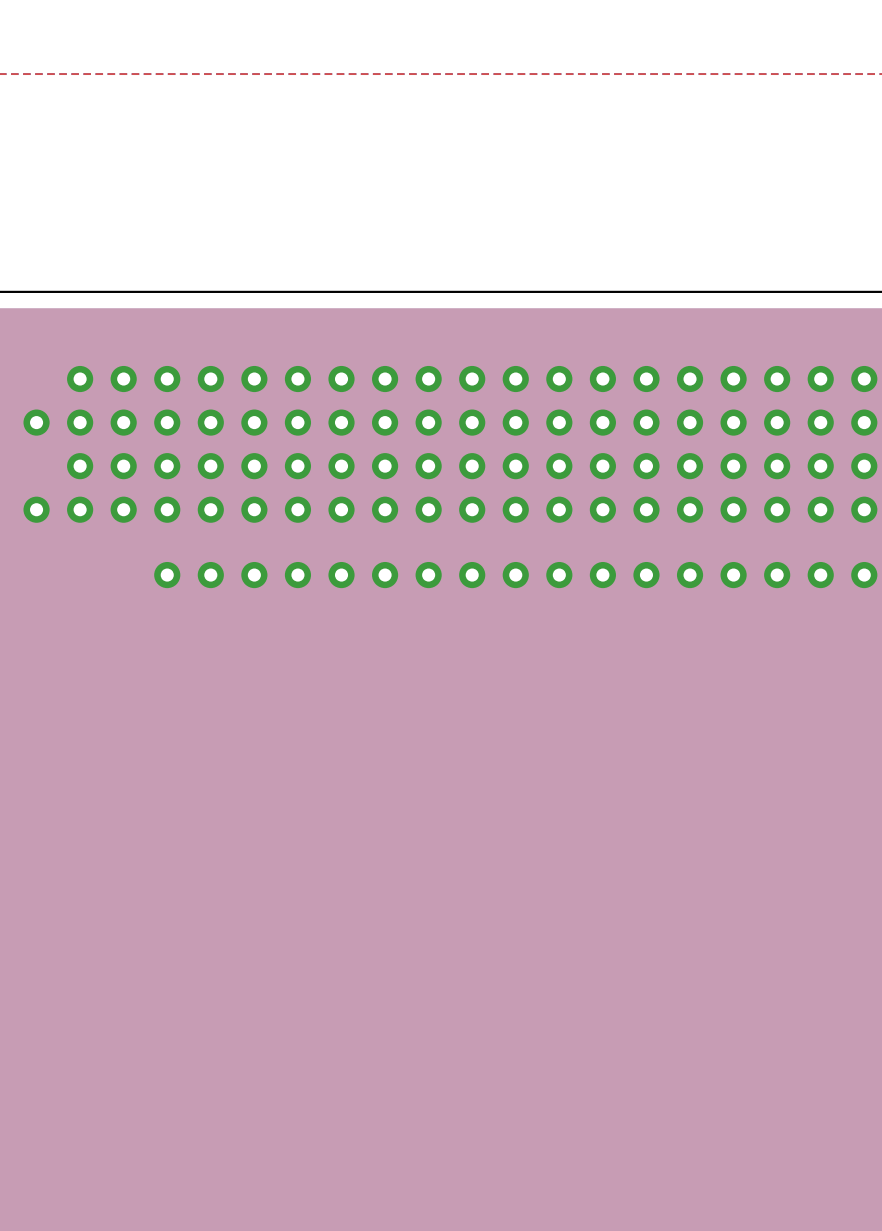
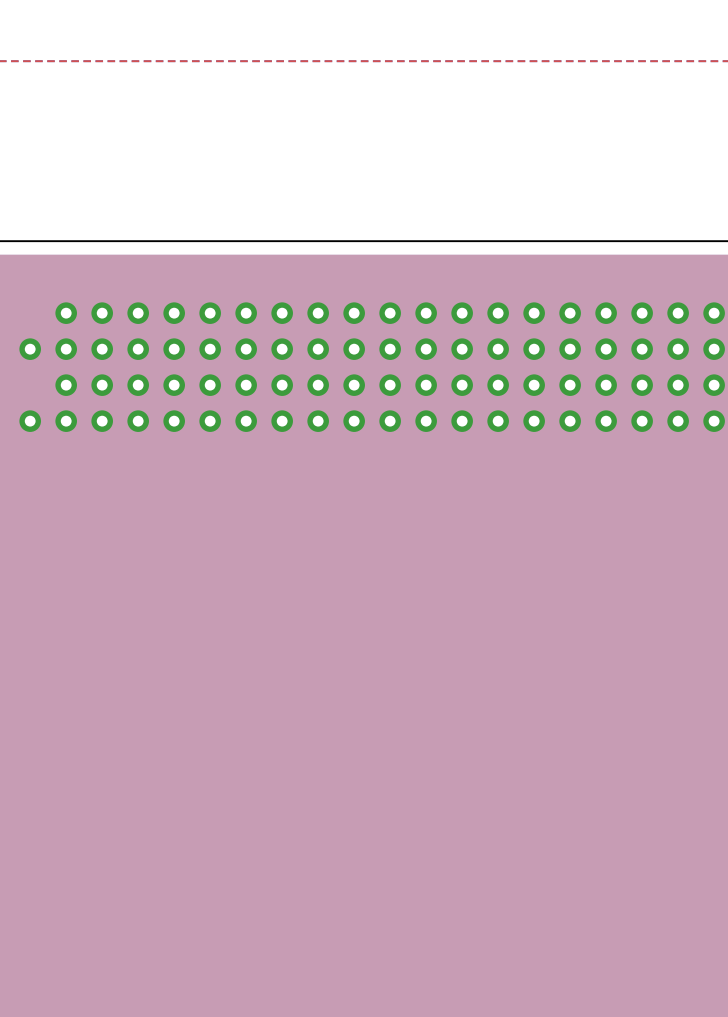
via: (167, 575) -> none
via: (210, 575) -> none
via: (254, 575) -> none
via: (297, 575) -> none
via: (341, 575) -> none
via: (385, 575) -> none
via: (428, 575) -> none
via: (472, 575) -> none
via: (515, 575) -> none
via: (559, 575) -> none
via: (602, 575) -> none
via: (646, 575) -> none
via: (690, 575) -> none
via: (733, 575) -> none
via: (777, 575) -> none
via: (820, 575) -> none
via: (864, 575) -> none

